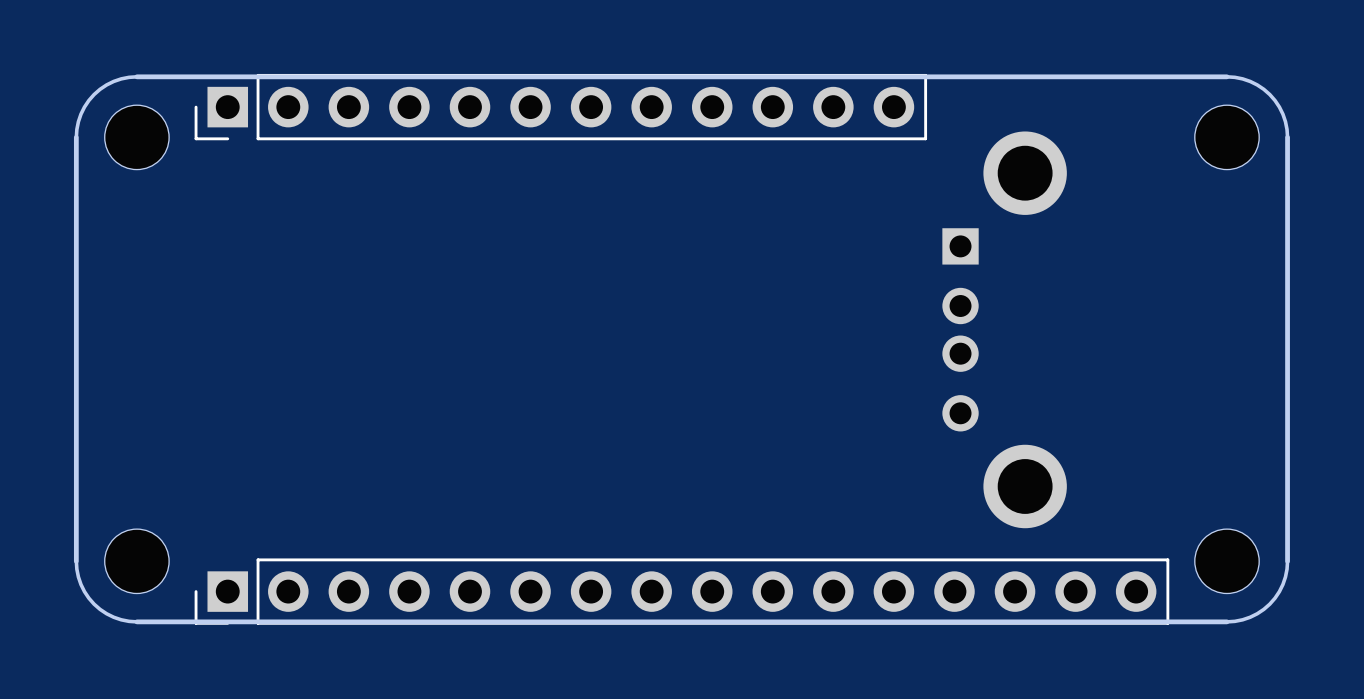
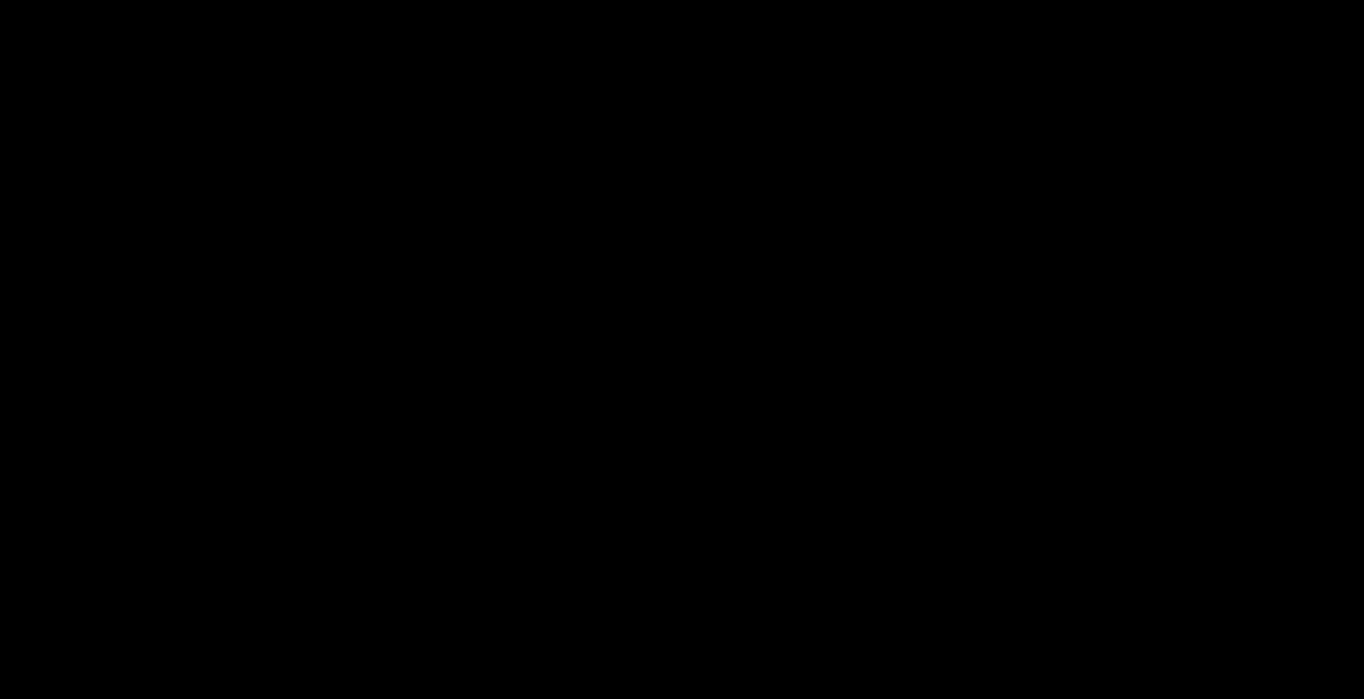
board edge: (1226, 76) (136, 76) (113, 81) (100, 89) (88, 100) (78, 121) (76, 137) (76, 561) (80, 584) (88, 598) (100, 609) (113, 617) (136, 621) (1226, 621) (1250, 617) (1263, 609) (1275, 598) (1282, 584) (1287, 569) (1287, 137) (1282, 114) (1269, 94) (1250, 81) (1226, 76) -> none
part: (560, 107) -> none
part: (136, 137) -> none
part: (1226, 137) -> none
part: (1004, 329) -> none
part: (136, 561) -> none
part: (1226, 561) -> none
part: (681, 591) -> none

